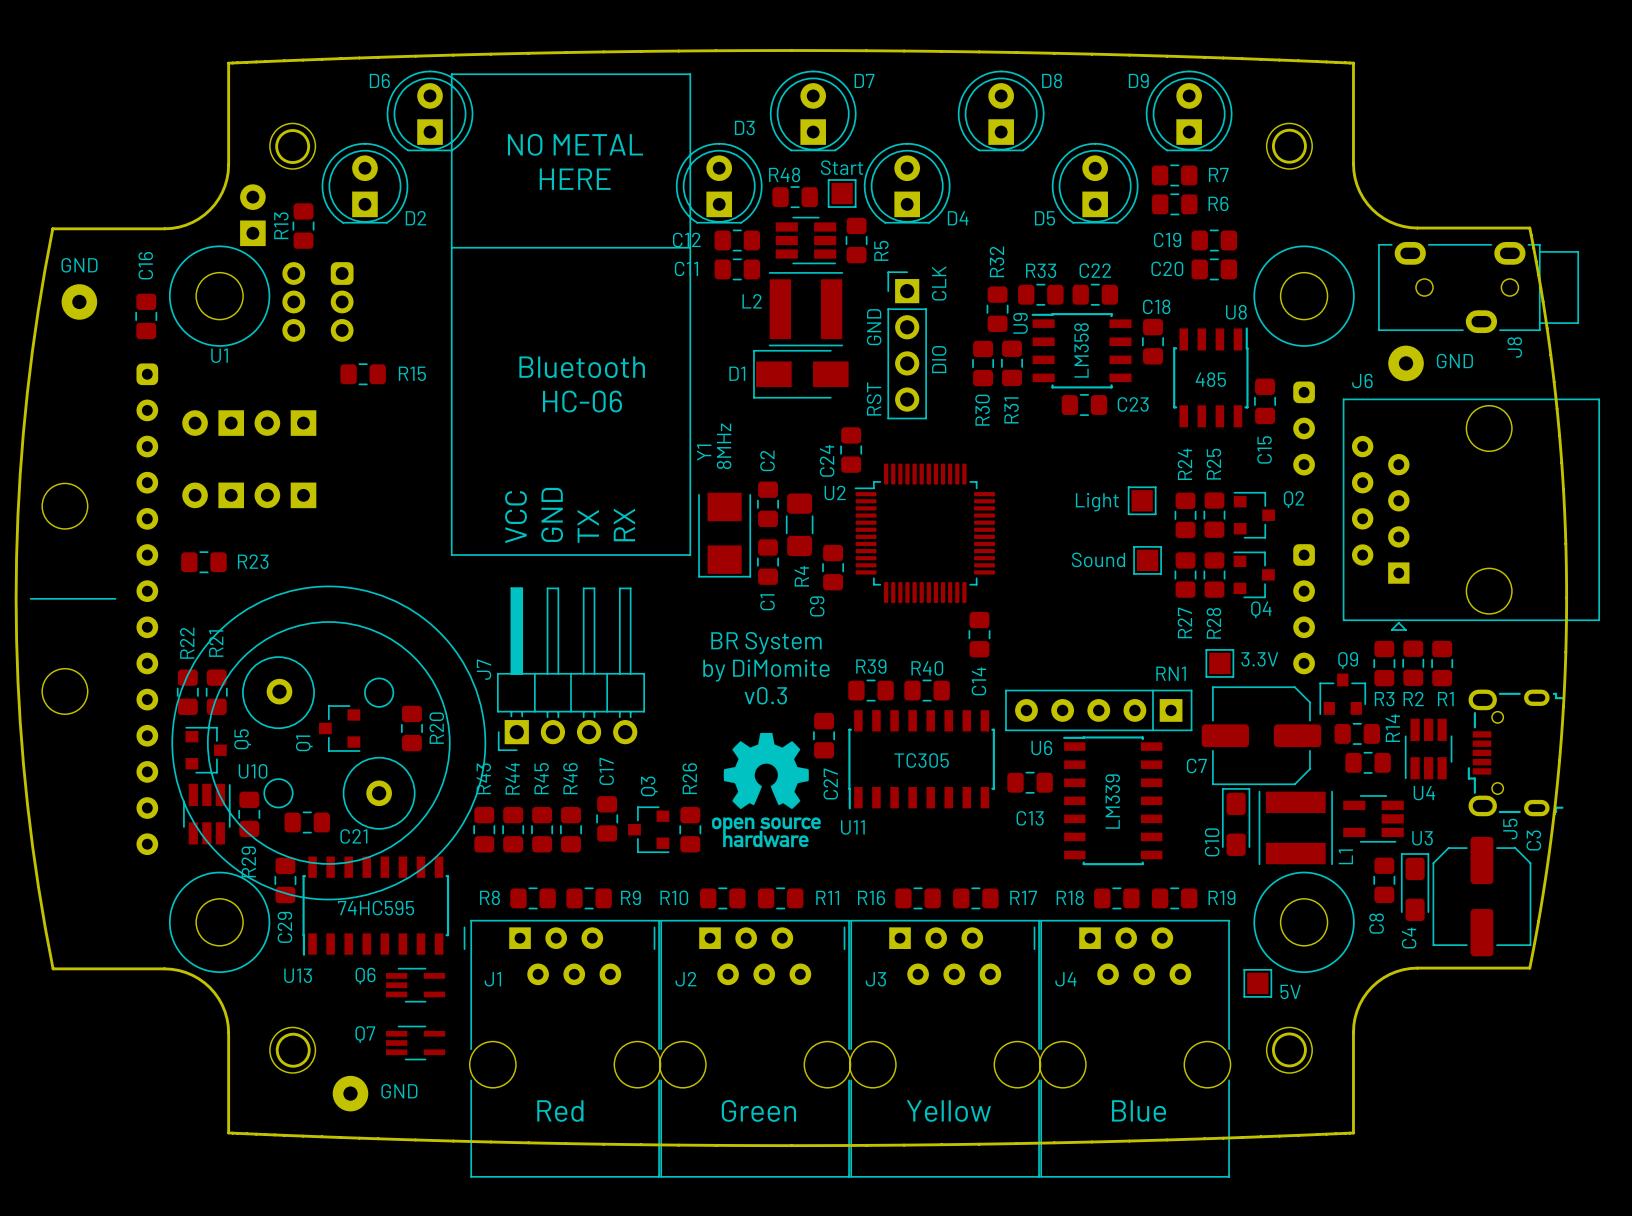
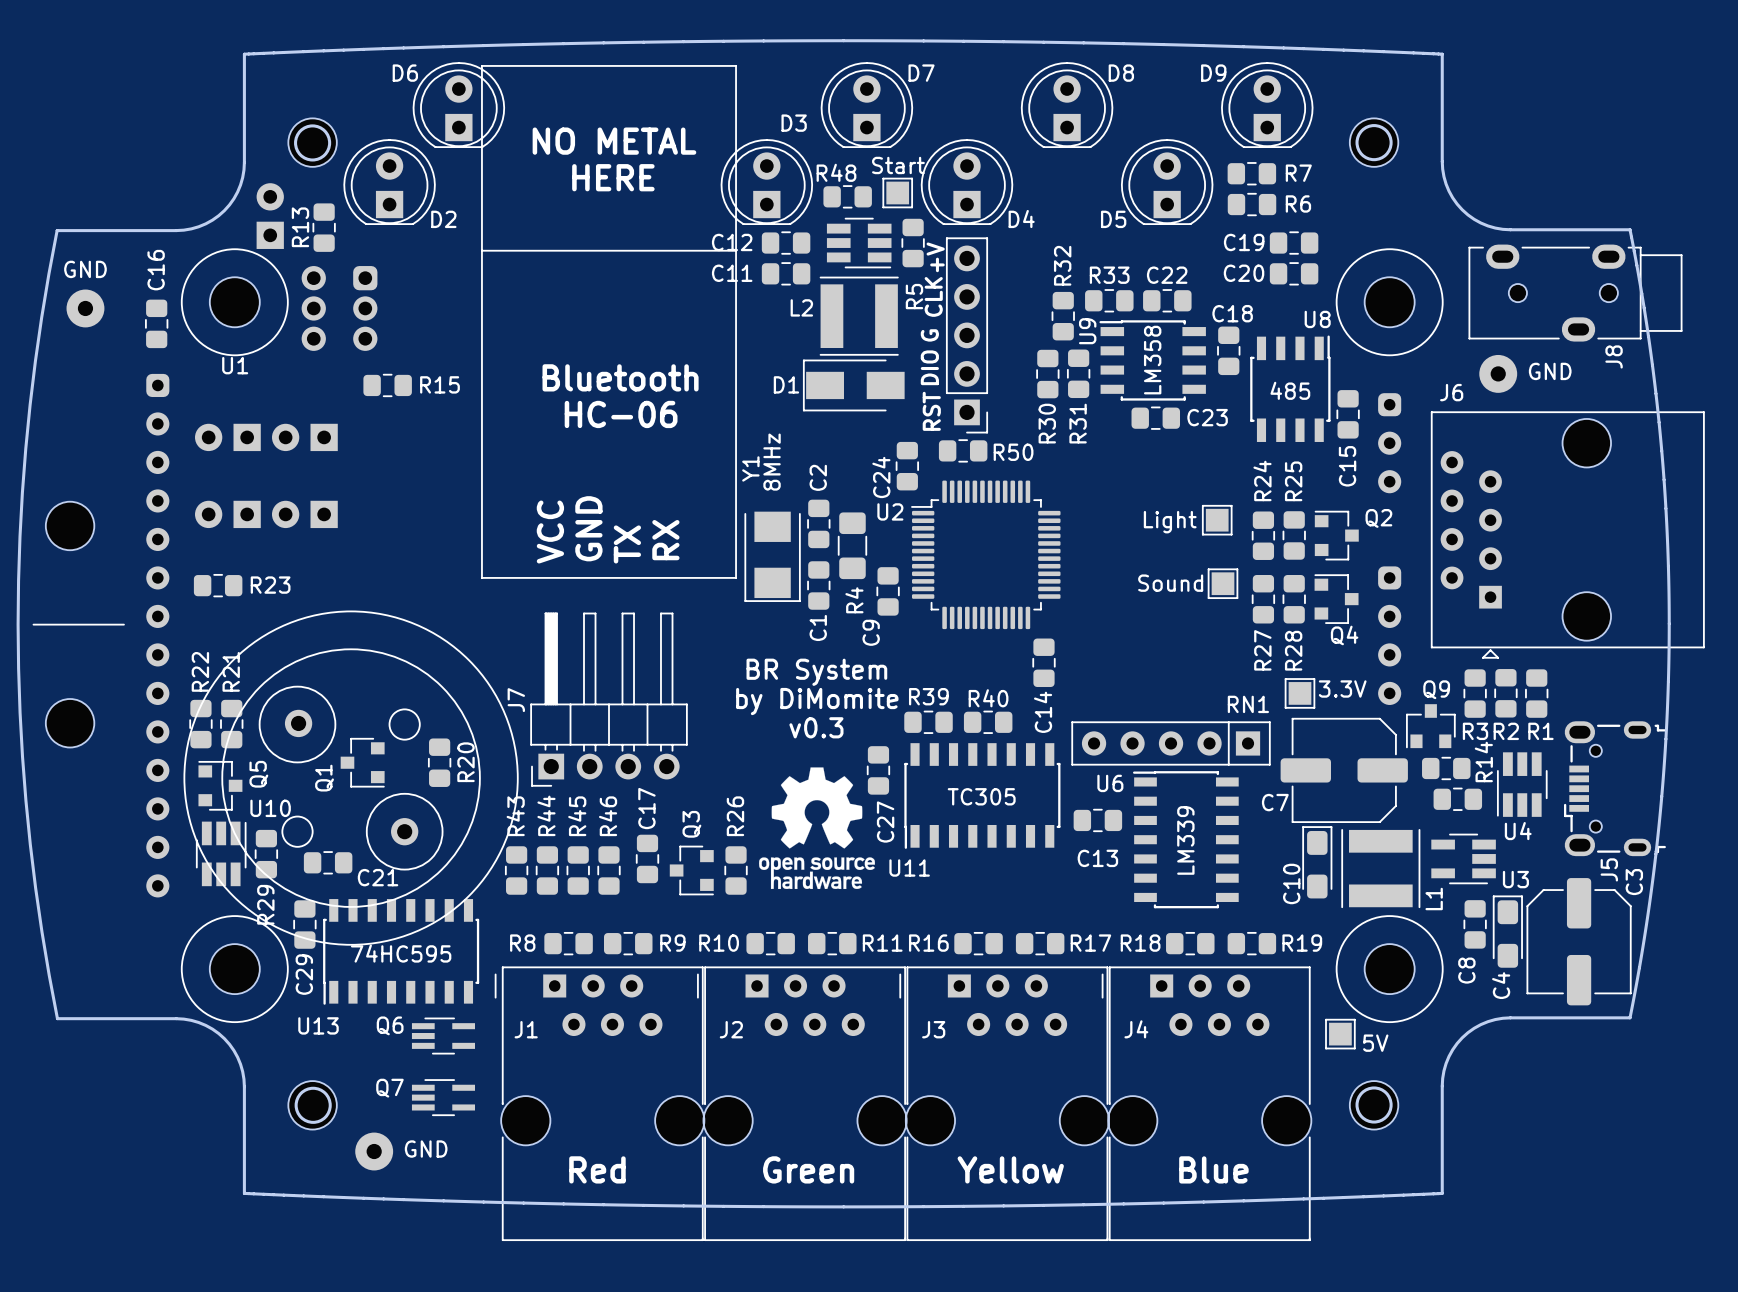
R5 name position: R5 (881, 250) -> R5 (914, 296)
text: none -> +V (935, 257)
text position: CLK (939, 283) -> CLK (933, 296)
text: GND (874, 327) -> G (929, 335)
part: none -> (967, 335)
part: (907, 345) -> none
text position: DIO (939, 359) -> DIO (929, 367)
R50: none -> (963, 450)

